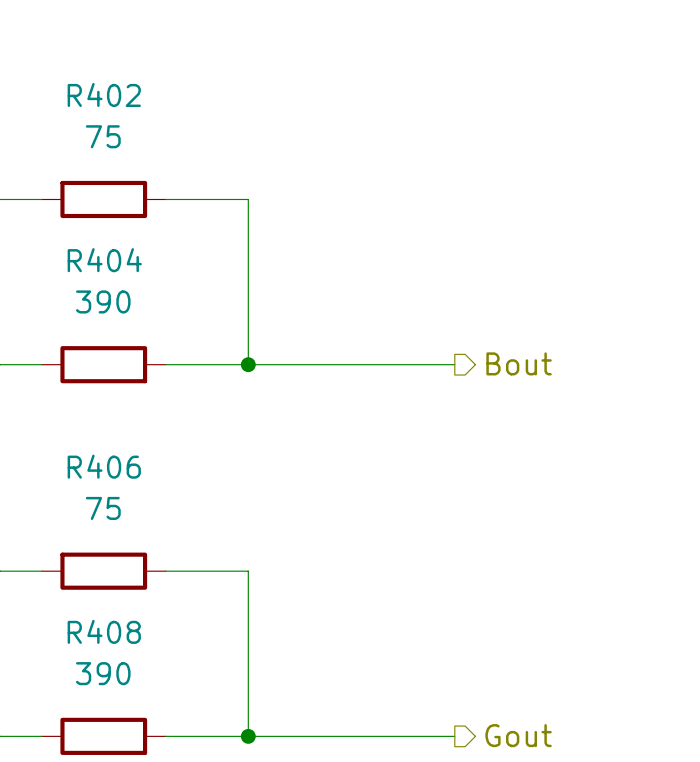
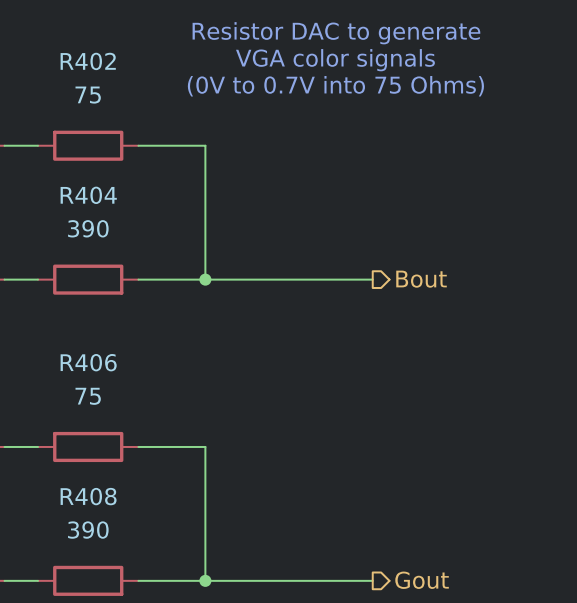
text: none -> Resistor DAC to generate (336, 33)
text: none -> VGA color signals (335, 60)
text: none -> (0V to 0.7V into 75 Ohms) (335, 86)

